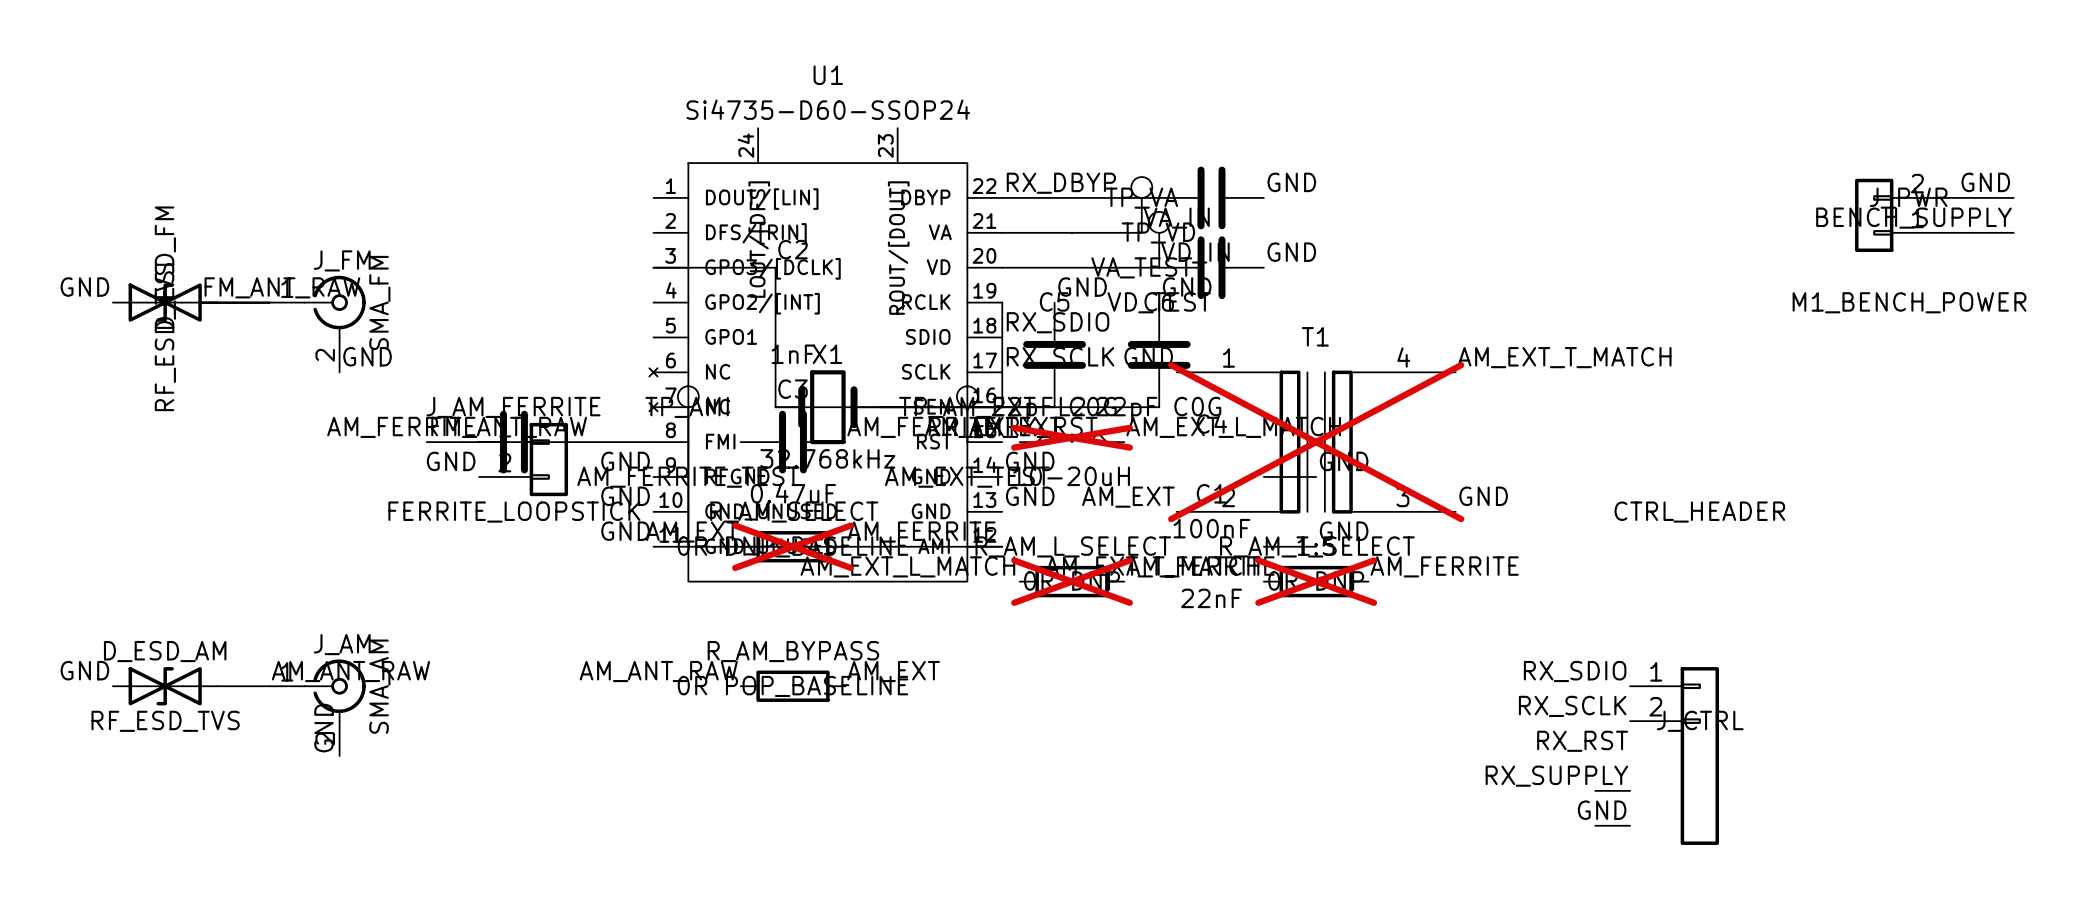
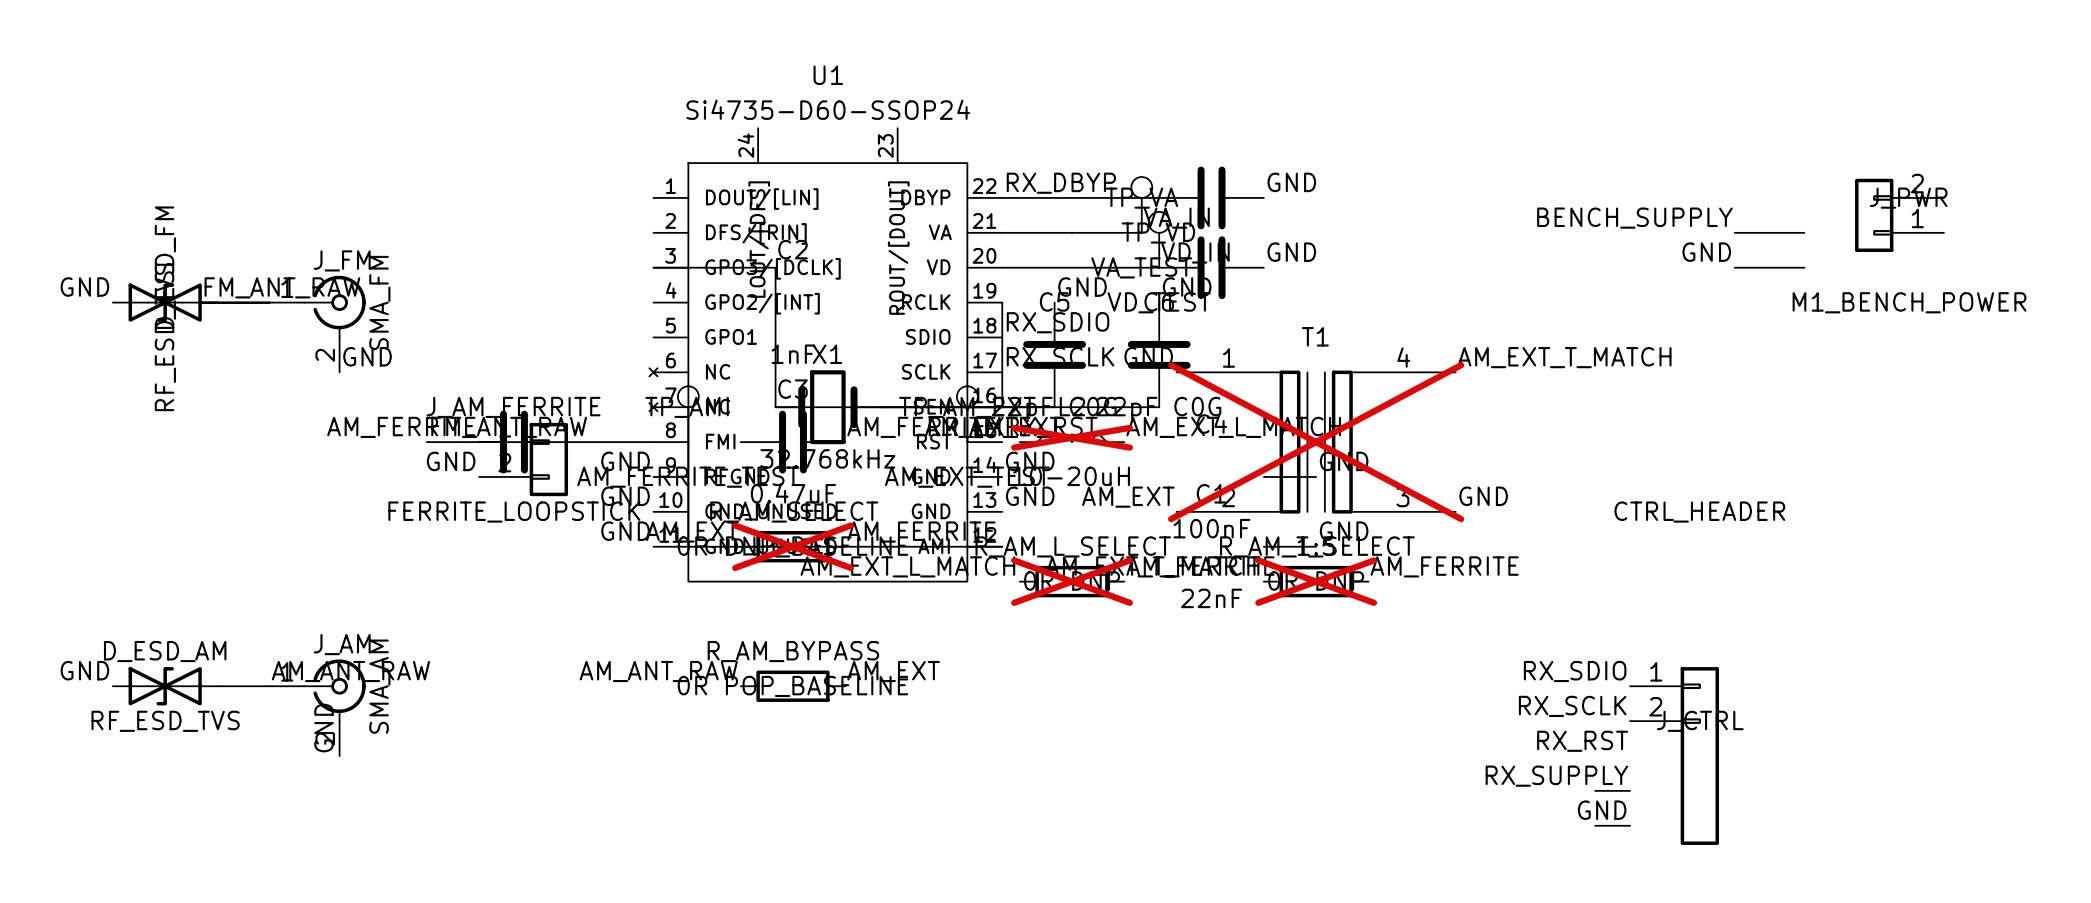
label position: GND (1985, 182) -> GND (1706, 252)
wire: (1943, 197) (2013, 197) -> (1734, 232) (1804, 232)
label position: BENCH_SUPPLY (1913, 218) -> BENCH_SUPPLY (1634, 218)
wire: (1943, 232) (2013, 232) -> (1734, 267) (1804, 267)

